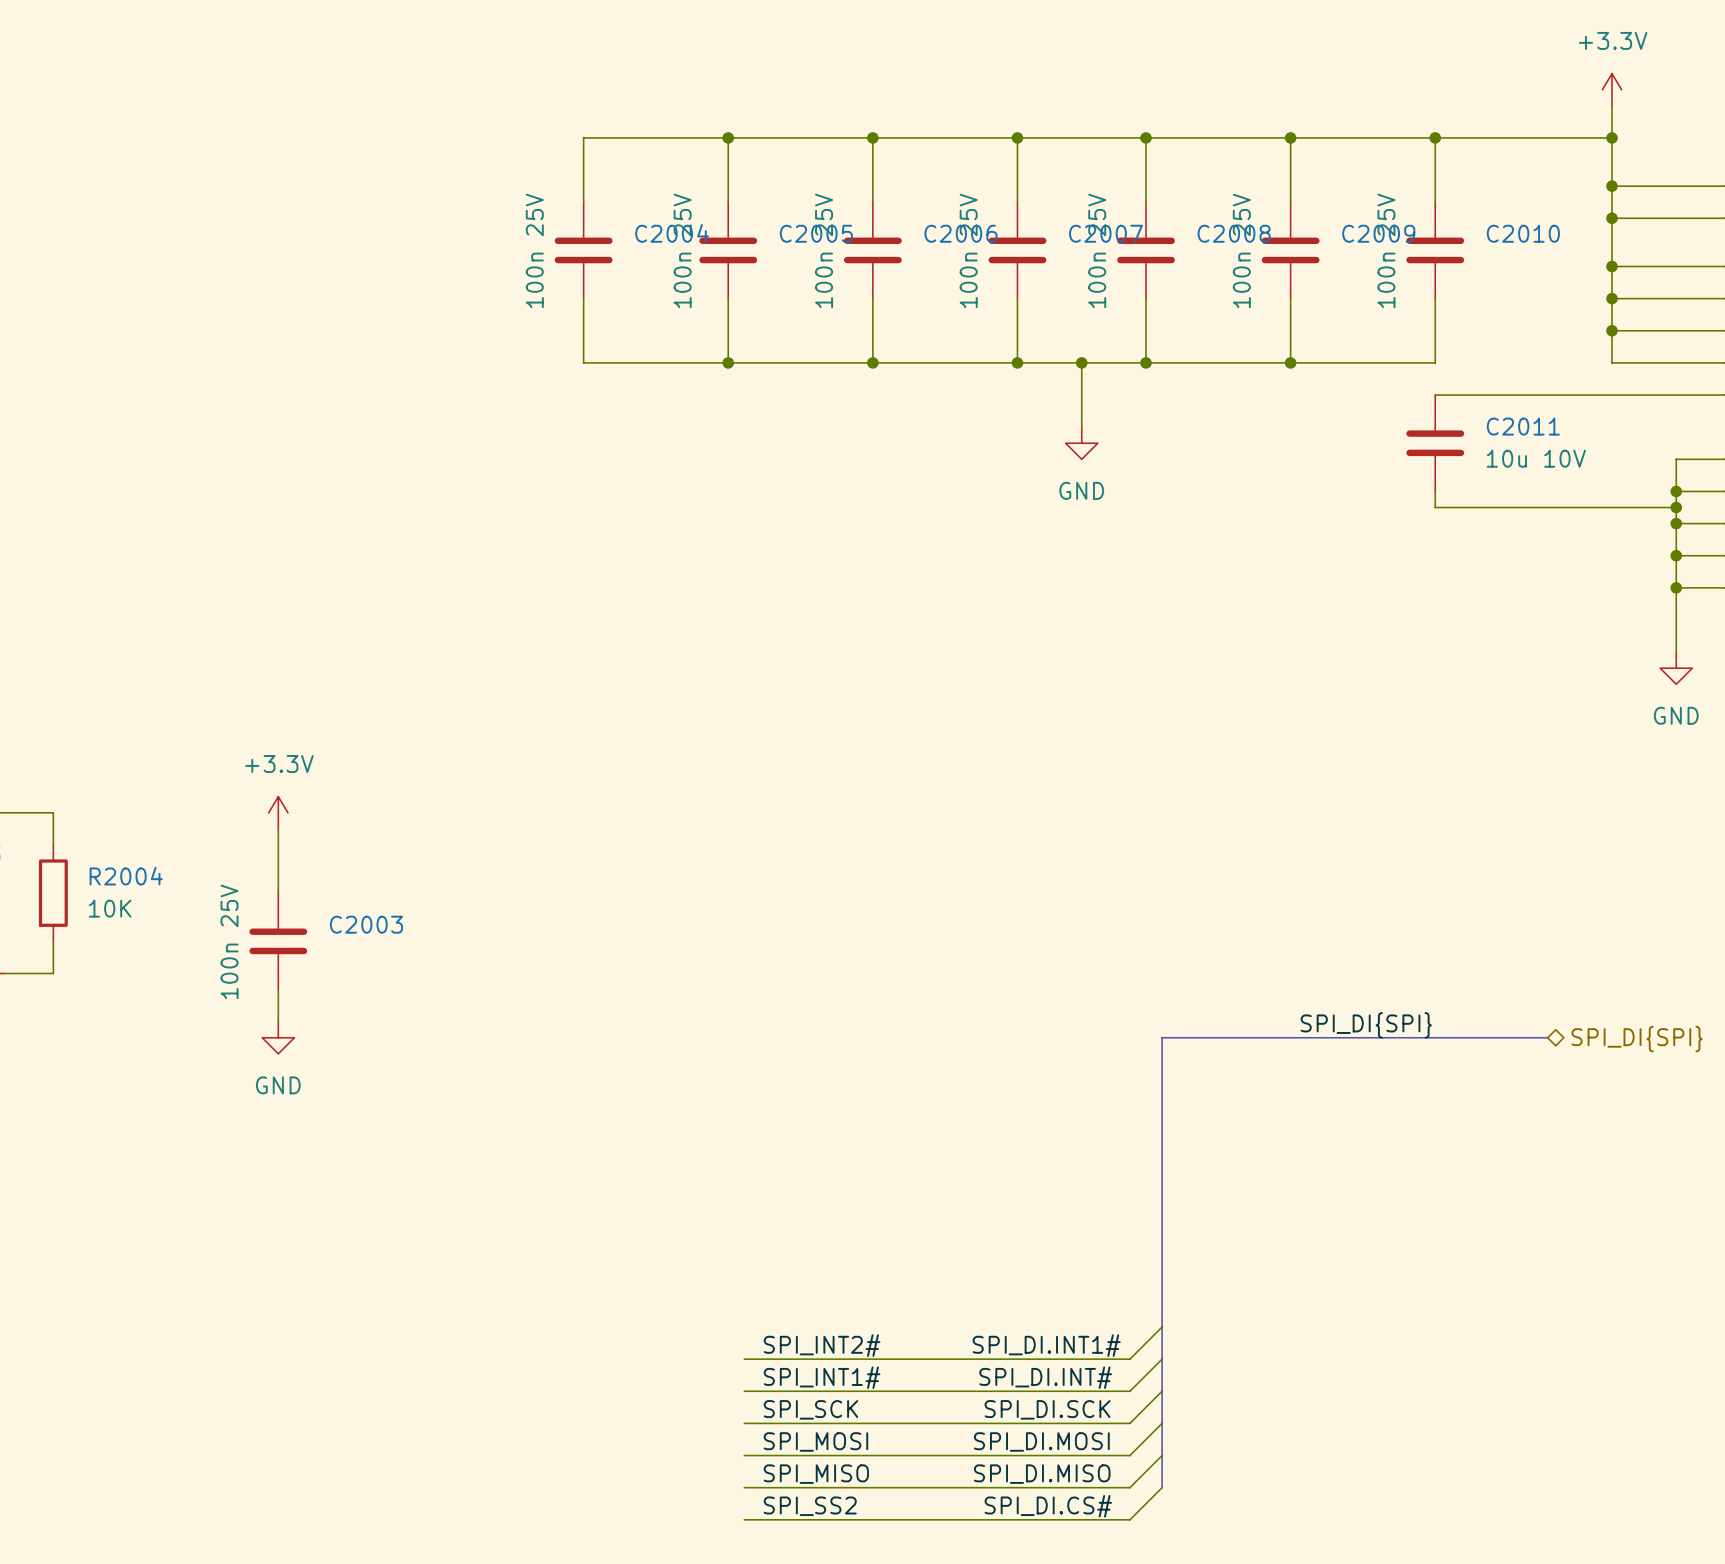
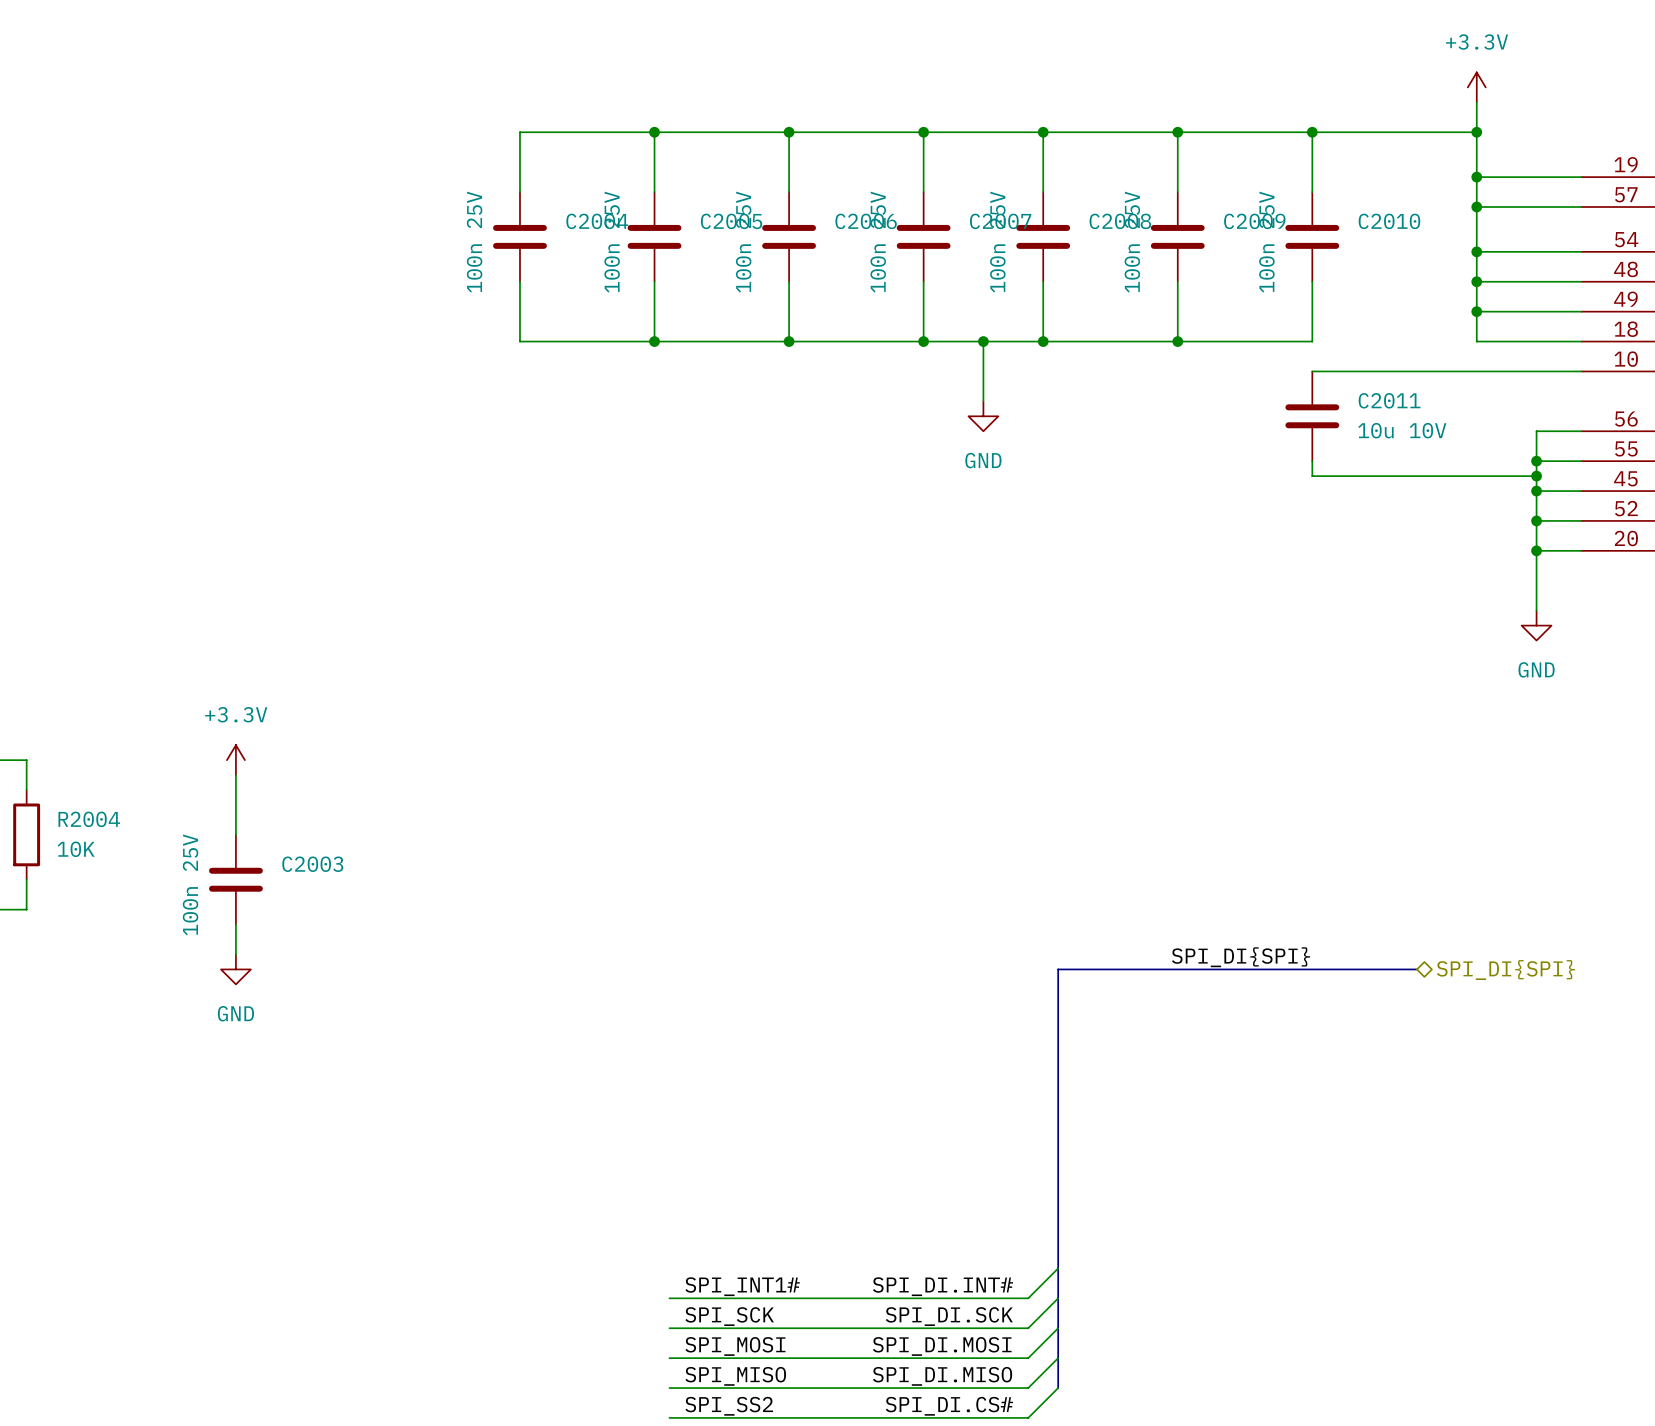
wire: (1162, 1327) (1129, 1359) (744, 1359) -> none
label: SPI_INT2# (822, 1345) -> none
label: SPI_DI.INT1# (1046, 1345) -> none

